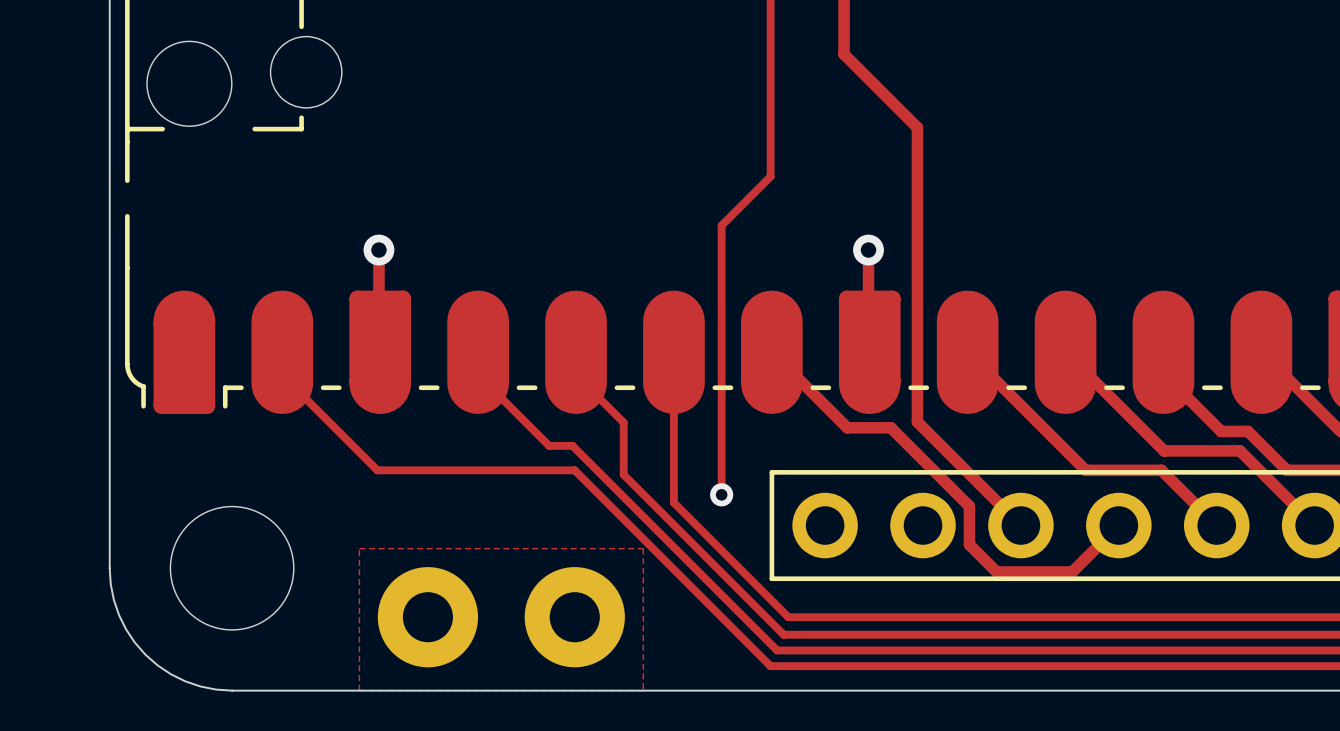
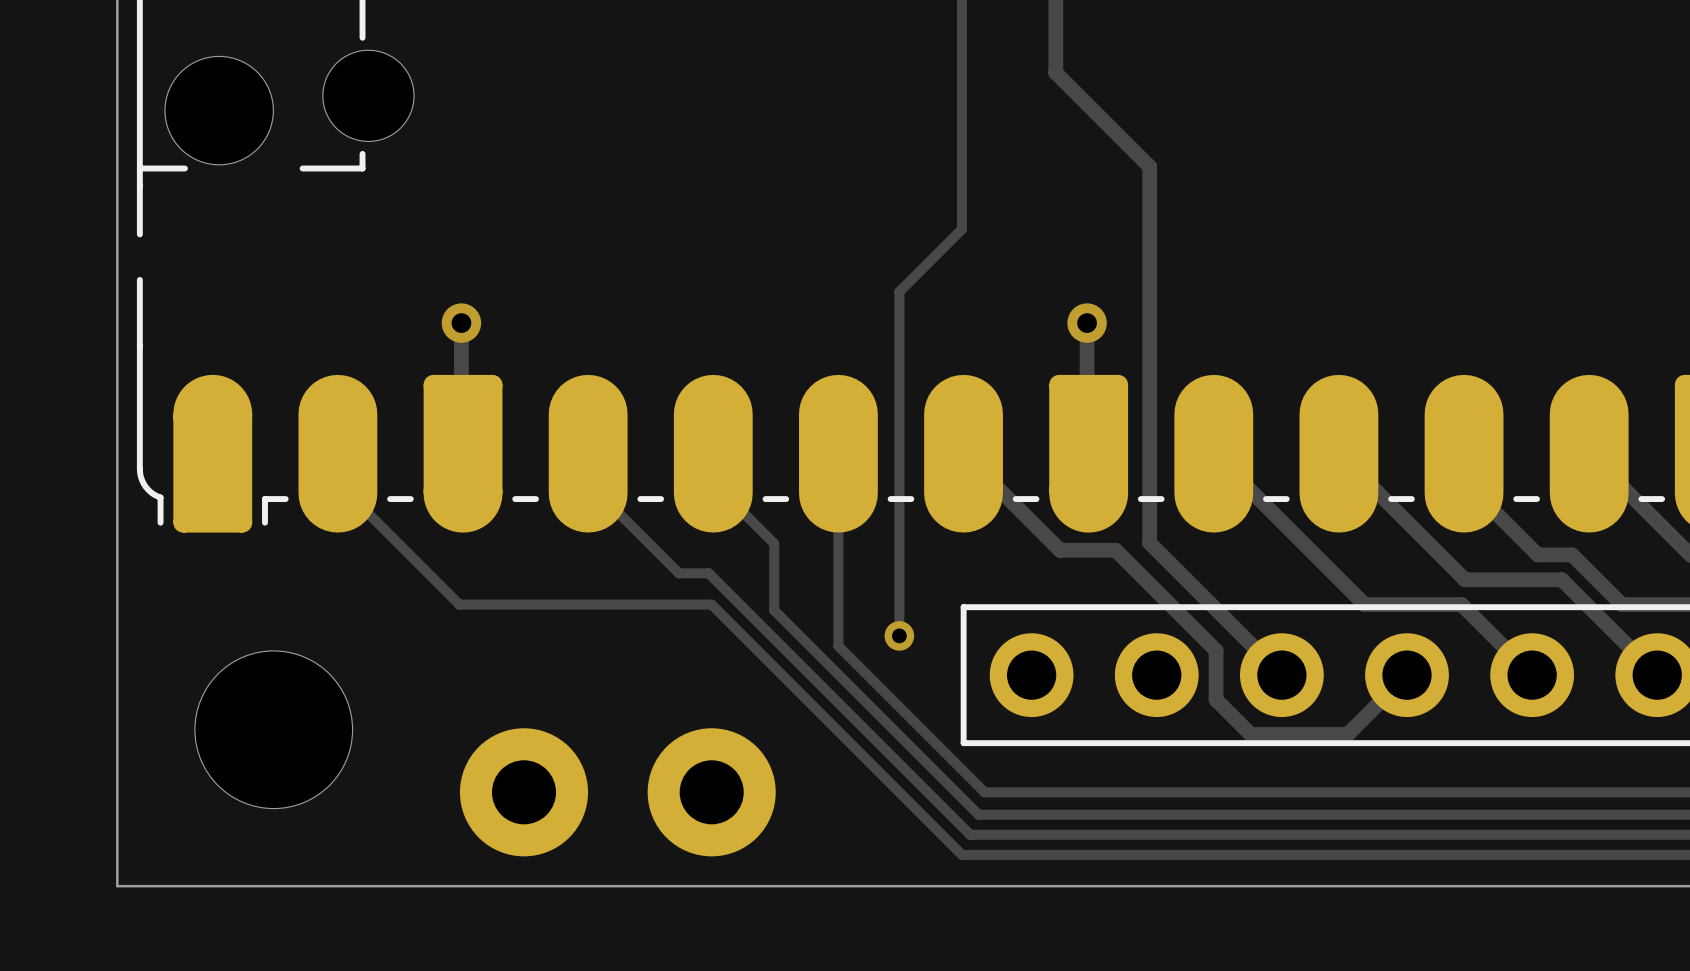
zone outline: (359, 548) (643, 548) (643, 690) (359, 690) (359, 548) -> none
board edge: (109, 568) (110, 584) (119, 615) (135, 642) (145, 654) (157, 665) (185, 681) (216, 689) (232, 690) -> (117, 729) (117, 886) (273, 886)

